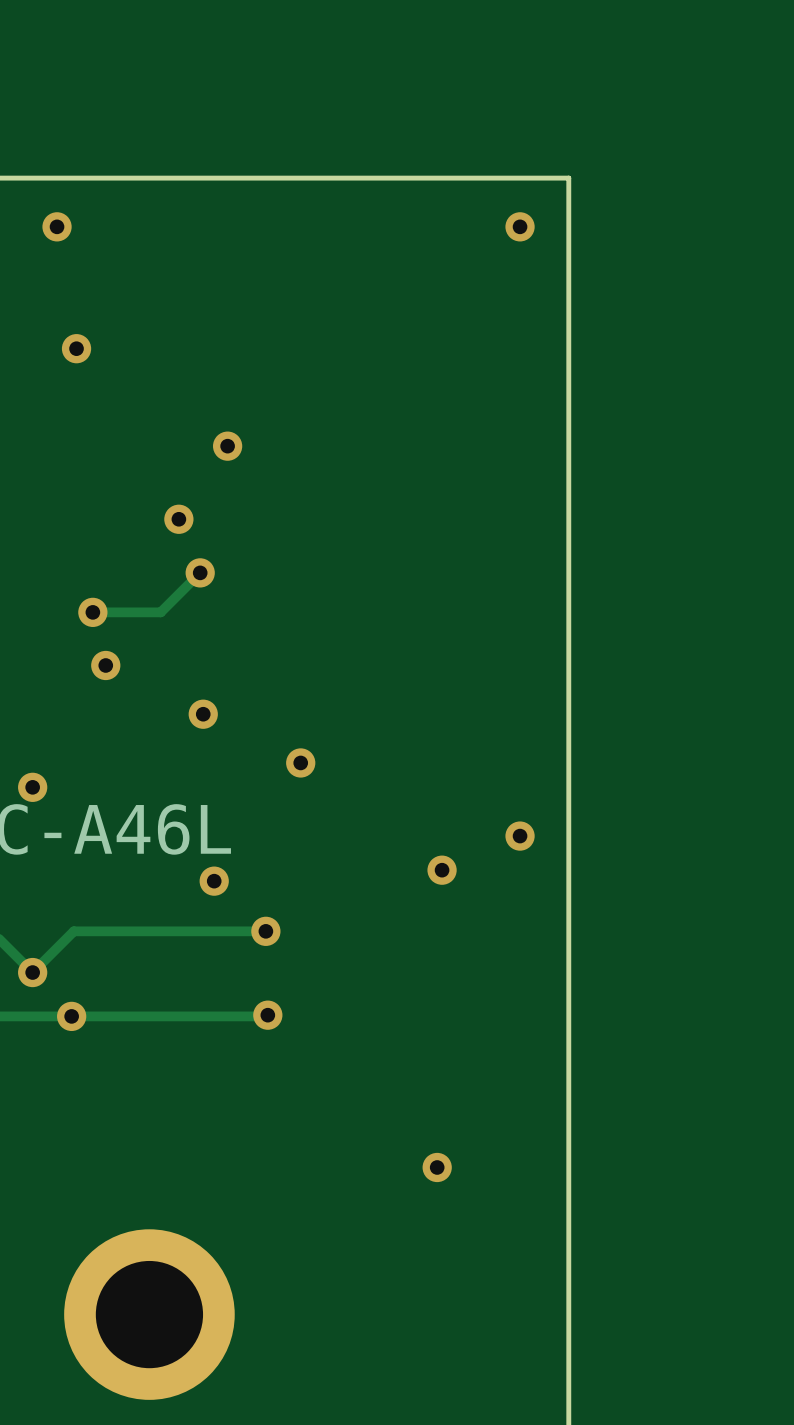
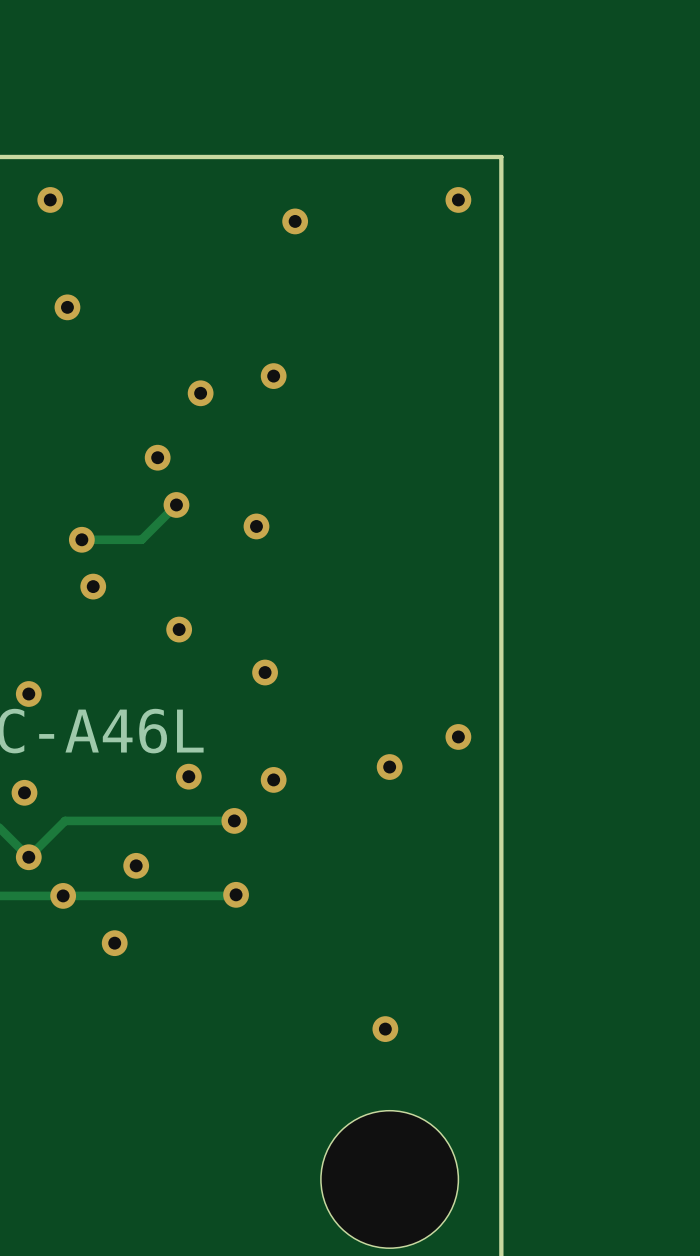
via: none -> (295, 221)
via: none -> (273, 376)
via: none -> (256, 526)
via: none -> (273, 779)
via: none -> (24, 792)
via: none -> (136, 865)
via: none -> (114, 943)
part: (149, 1314) -> none
part: none -> (389, 1179)

